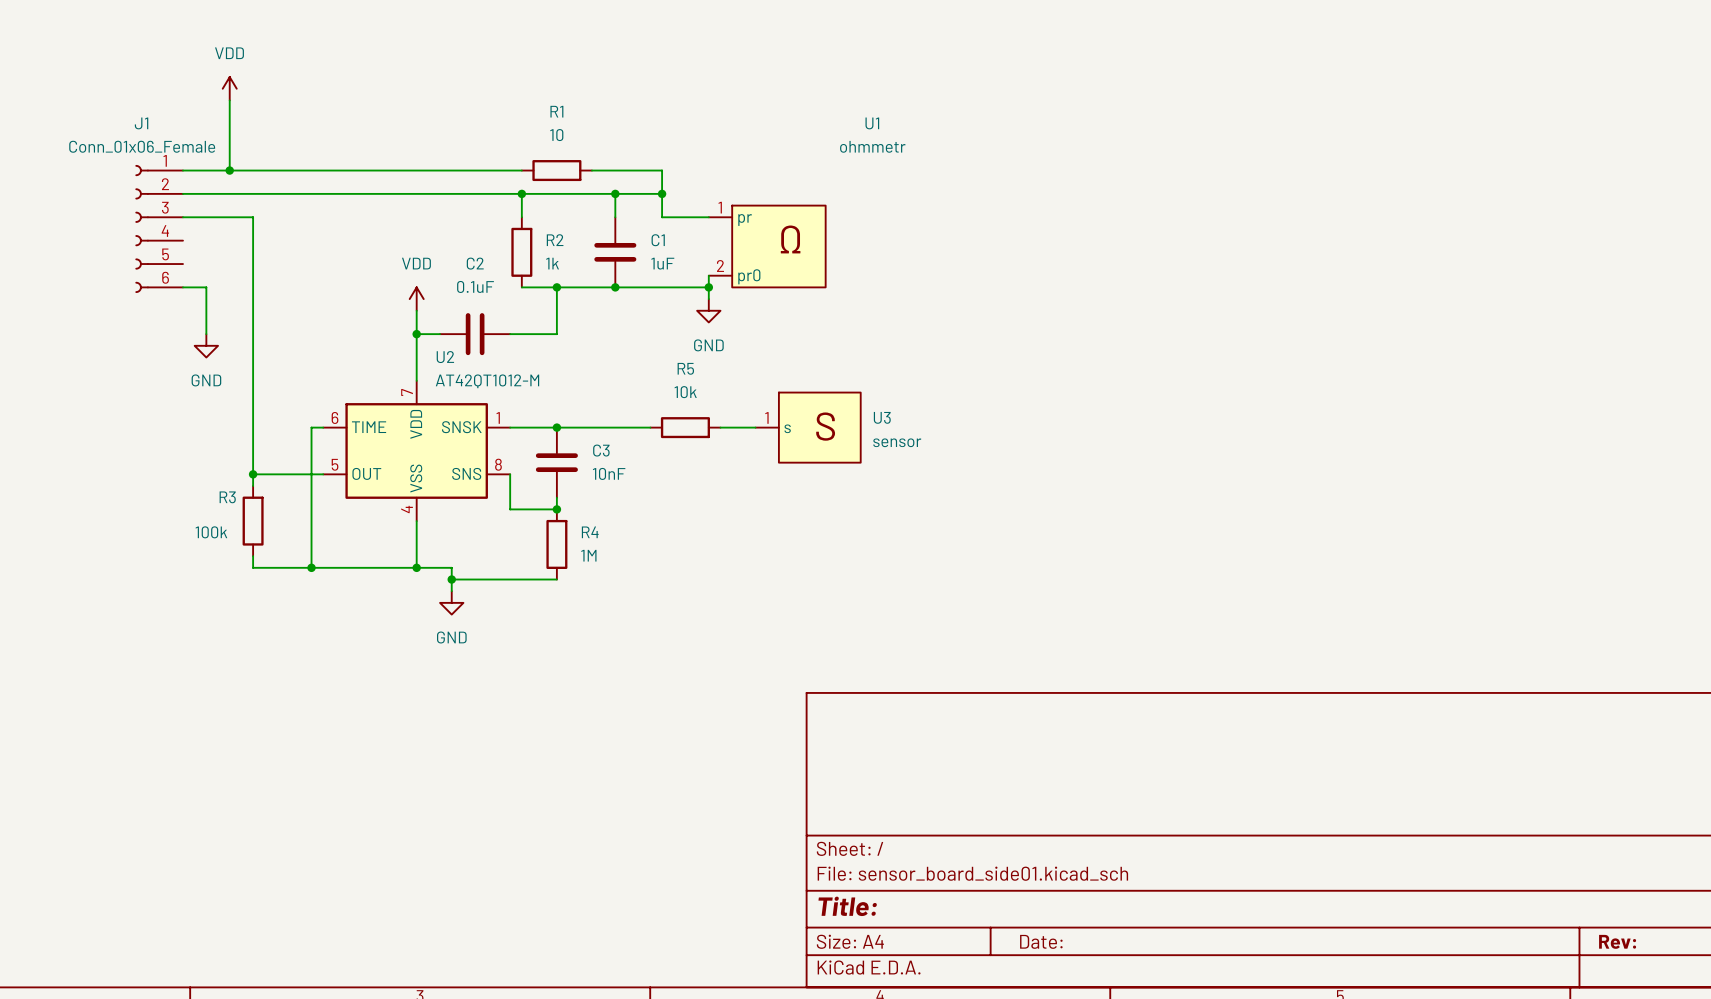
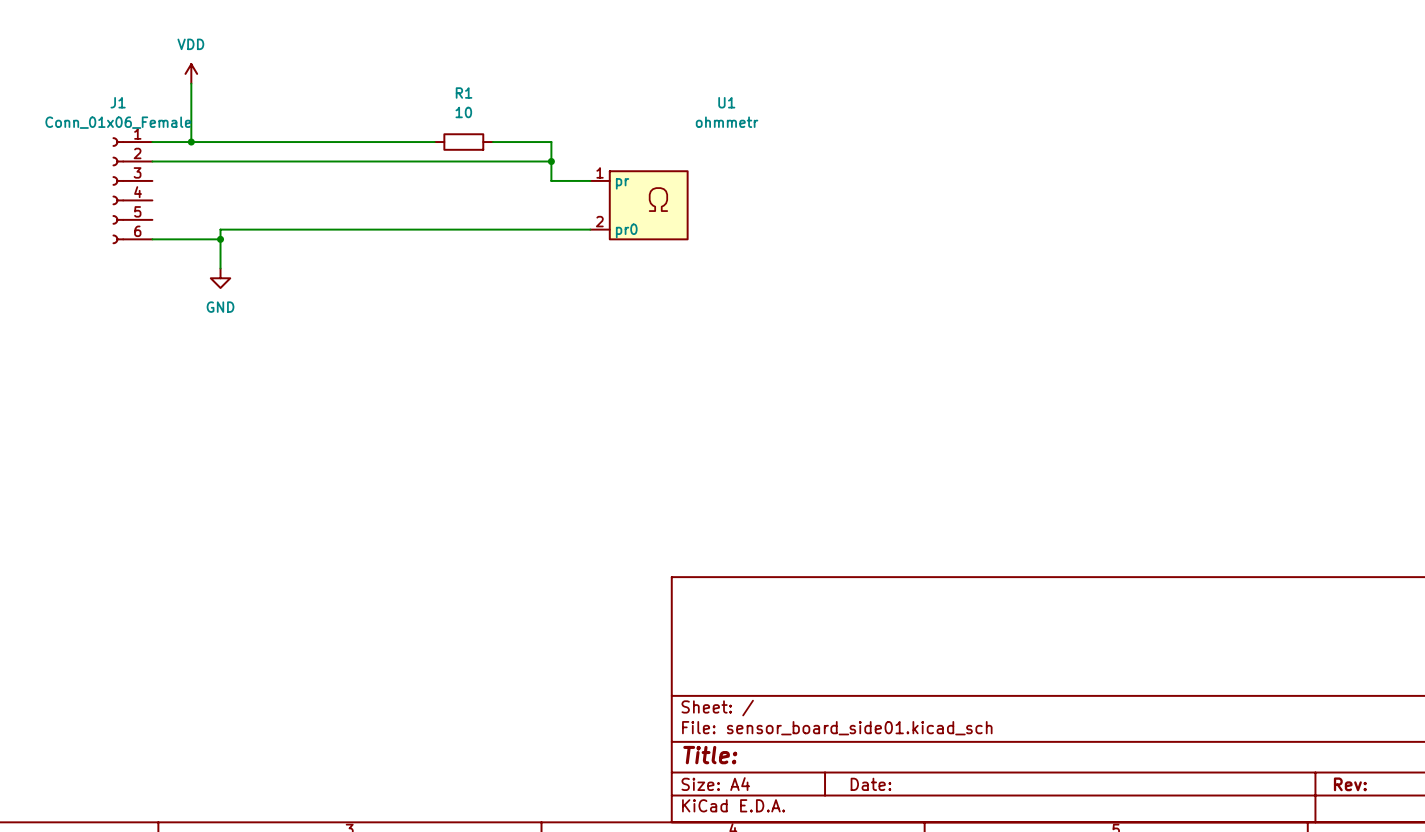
wire: (521, 193) (521, 217) -> none
junction: (521, 193) -> none
wire: (615, 193) (615, 217) -> none
junction: (615, 193) -> none
wire: (182, 217) (253, 217) (253, 486) -> none
R2: 1k (521, 252) -> none
C1: 1uF (615, 252) -> none
wire: (708, 275) (708, 299) -> (590, 229) (220, 229) (220, 268)
wire: (206, 287) (206, 334) -> (171, 239) (220, 239)
junction: none -> (220, 239)
wire: (521, 287) (708, 287) -> none
wire: (556, 287) (556, 334) (510, 334) -> none
junction: (556, 287) -> none
junction: (615, 287) -> none
junction: (708, 287) -> none
power symbol: VDD (416, 299) -> none
wire: (416, 310) (416, 380) -> none
power symbol: GND (708, 310) -> none
wire: (416, 334) (440, 334) -> none
junction: (416, 334) -> none
C2: 0.1uF (475, 334) -> none
power symbol position: GND (206, 345) -> GND (220, 278)
wire: (323, 427) (311, 427) (311, 567) -> none
wire: (510, 427) (650, 427) -> none
junction: (556, 427) -> none
R5: 10k (685, 427) -> none
wire: (720, 427) (755, 427) -> none
U3: sensor (810, 429) -> none
U2: AT42QT1012-M (416, 450) -> none
C3: 10nF (556, 462) -> none
wire: (253, 474) (323, 474) -> none
junction: (253, 474) -> none
wire: (510, 474) (510, 509) (556, 509) (556, 497) -> none
junction: (556, 509) -> none
R3: 100k (253, 521) -> none
wire: (416, 521) (416, 567) -> none
R4: 1M (556, 544) -> none
wire: (253, 556) (253, 567) (451, 567) (451, 591) -> none
junction: (311, 567) -> none
junction: (416, 567) -> none
wire: (451, 579) (556, 579) -> none
junction: (451, 579) -> none
power symbol: GND (451, 602) -> none

